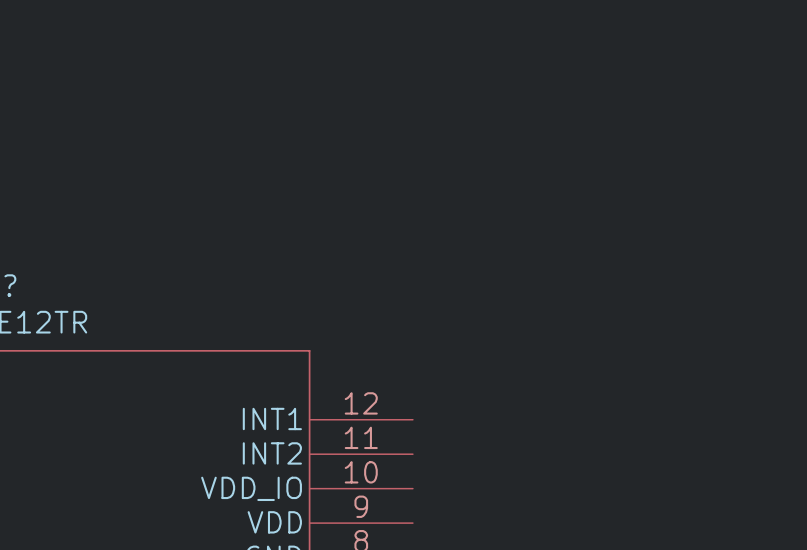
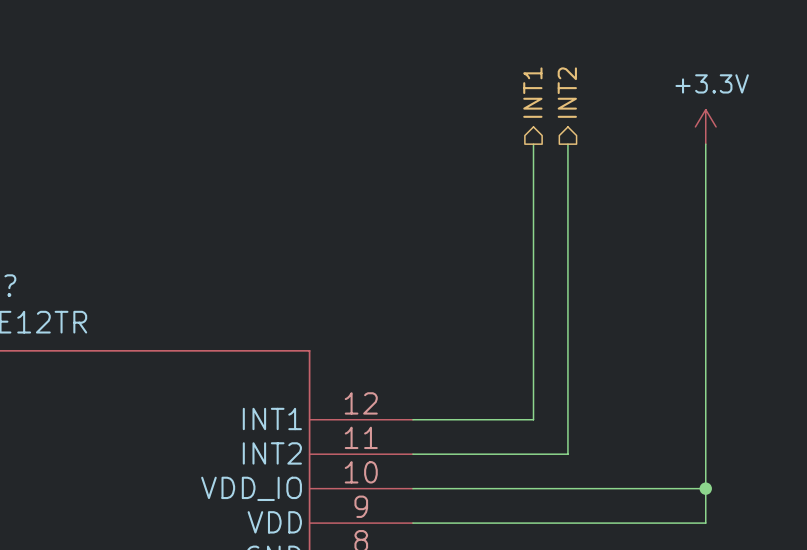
hierarchical label: none -> INT1 (532, 92)
hierarchical label: none -> INT2 (567, 92)
power symbol: none -> +3.3V (705, 126)
wire: none -> (533, 144) (533, 419) (412, 419)
wire: none -> (567, 144) (567, 454) (412, 454)
wire: none -> (705, 144) (705, 523) (412, 523)
wire: none -> (412, 488) (705, 488)
junction: none -> (705, 488)

